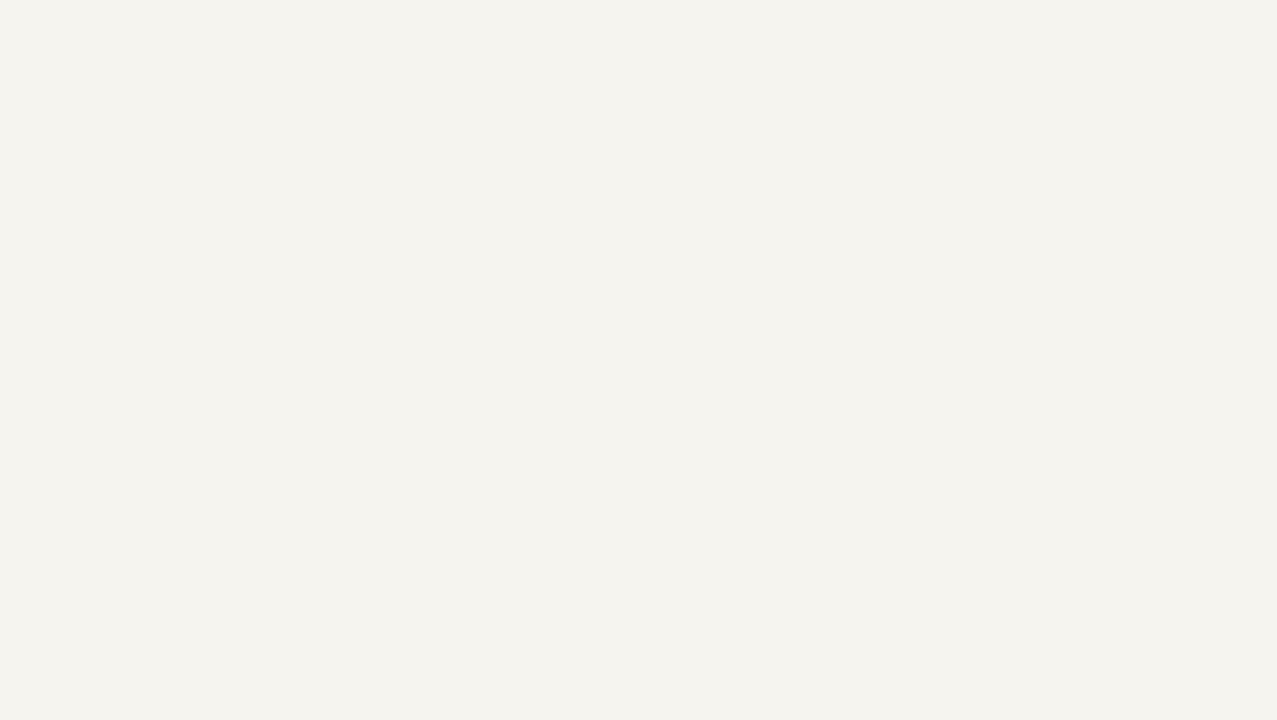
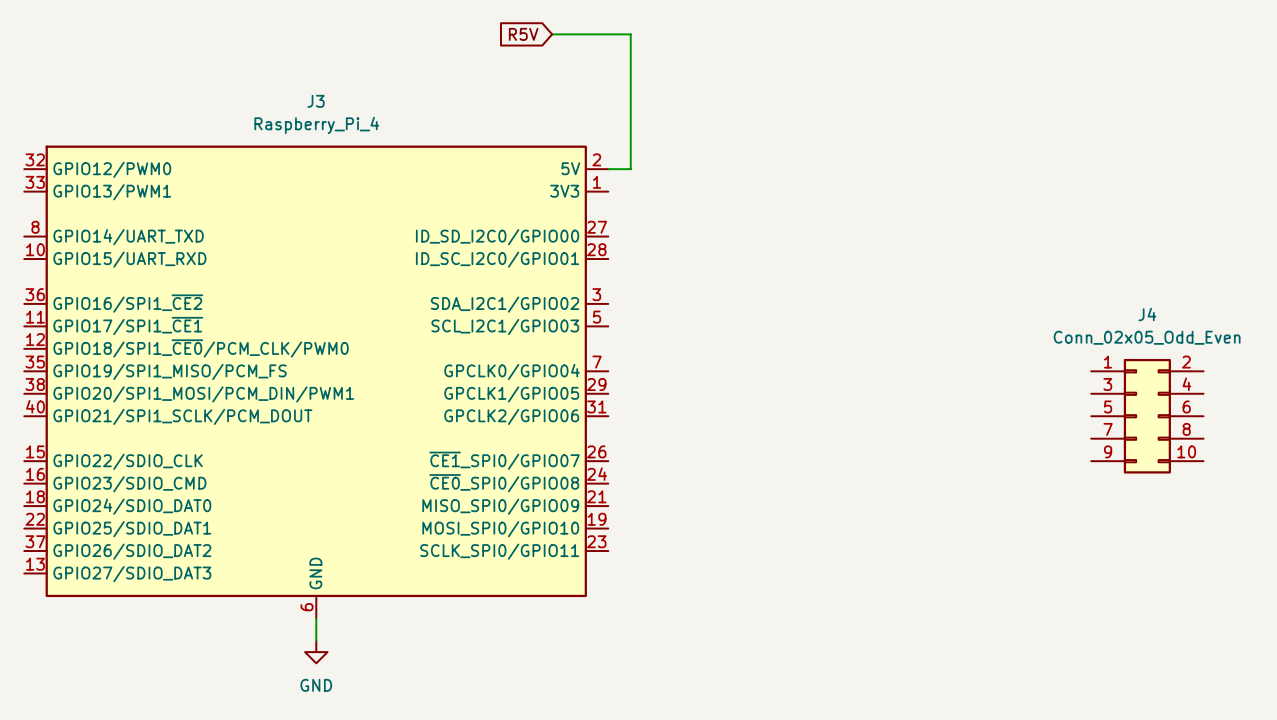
global label: none -> R5V (523, 34)
wire: none -> (552, 34) (630, 34) (630, 169) (608, 169)
J3: none -> Raspberry_Pi_4 (316, 381)
J4: none -> Conn_02x05_Odd_Even (1147, 416)
wire: none -> (316, 618) (316, 640)
power symbol: none -> GND (316, 652)

